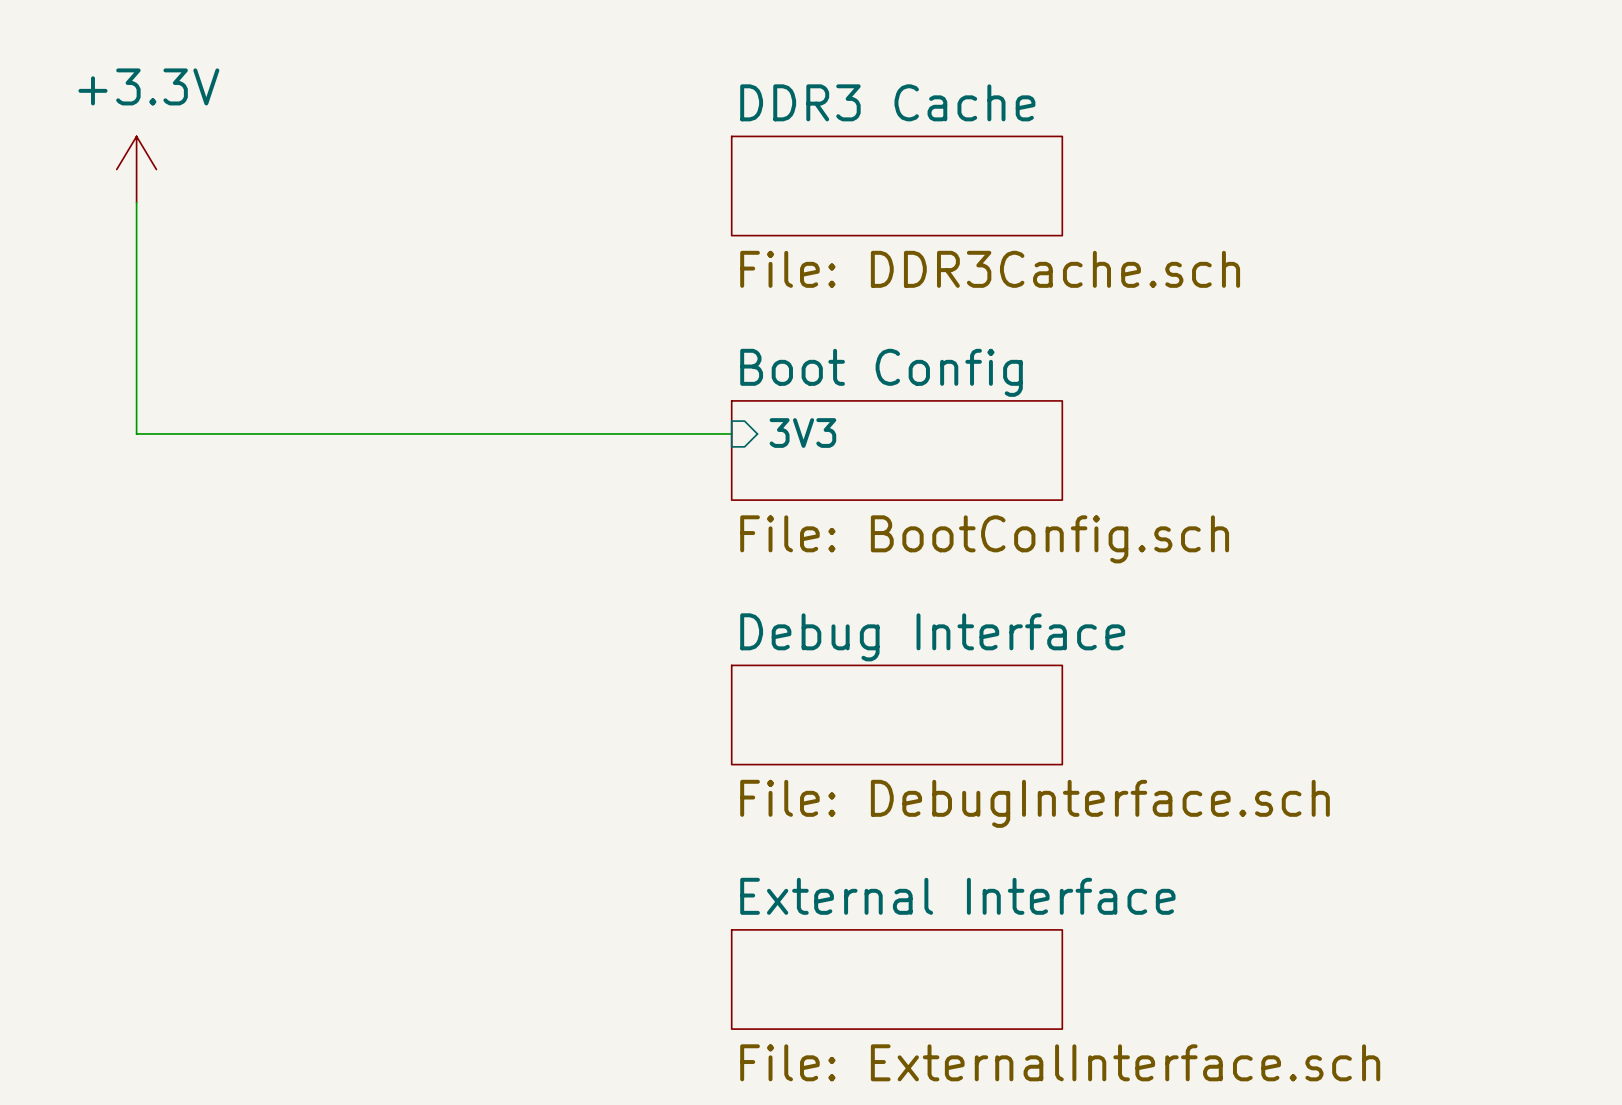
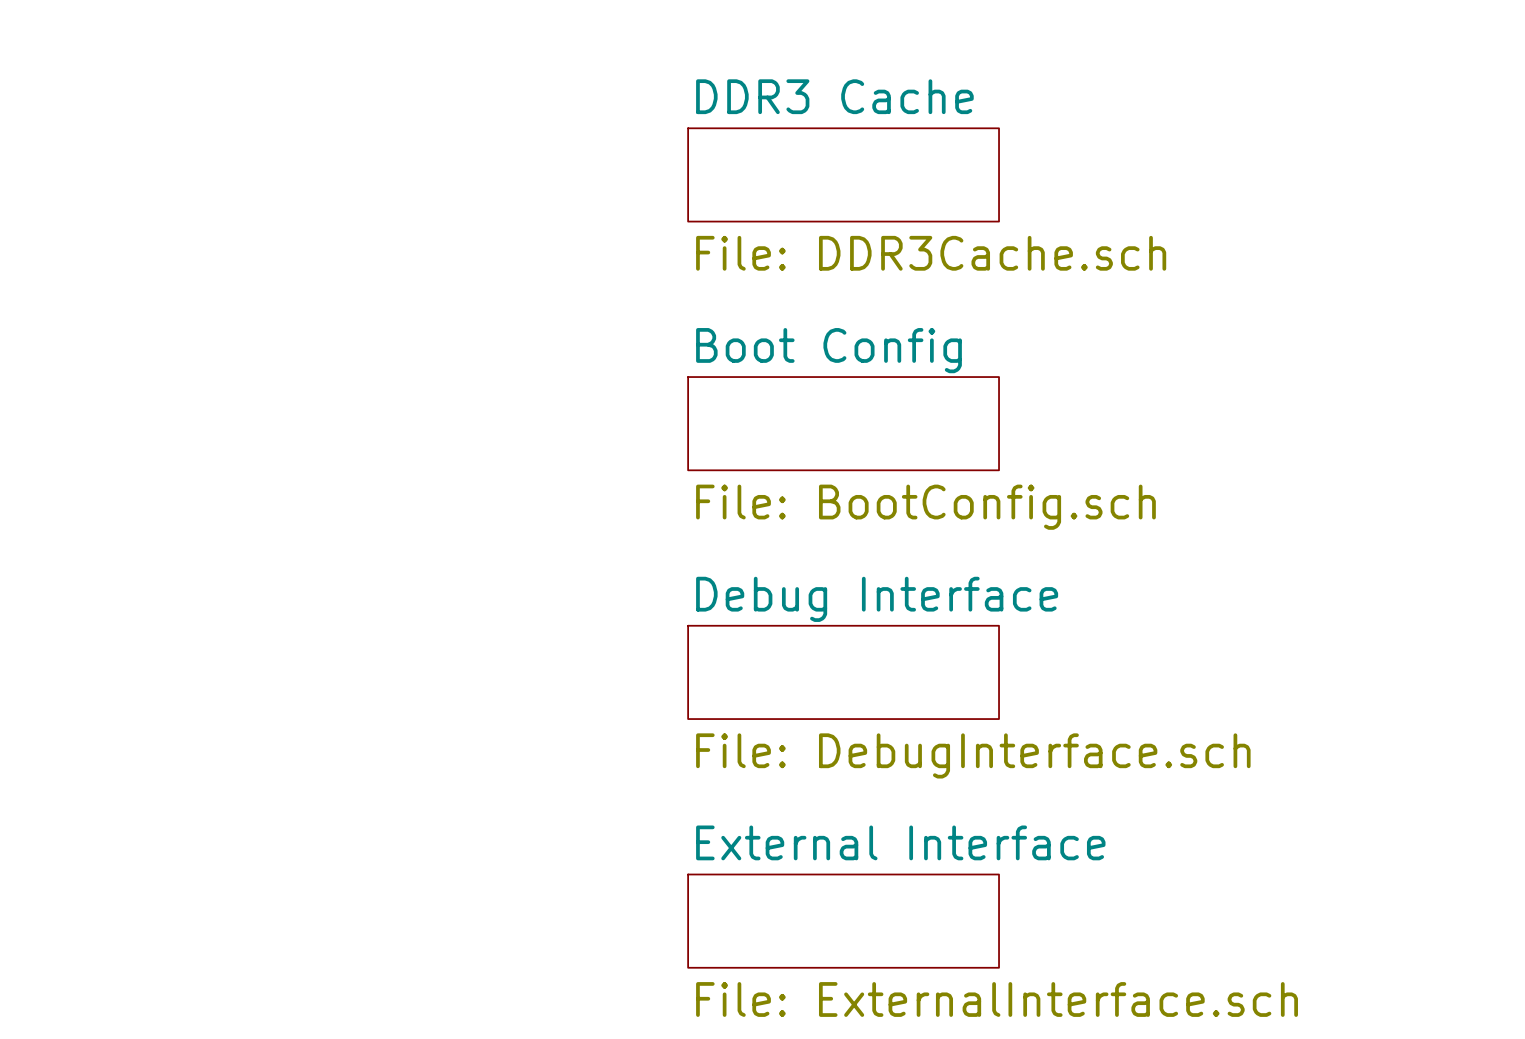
power symbol: +3.3V (136, 169) -> none
wire: (136, 202) (136, 433) (731, 433) -> none
sheet pin: 3V3 (802, 433) -> none

